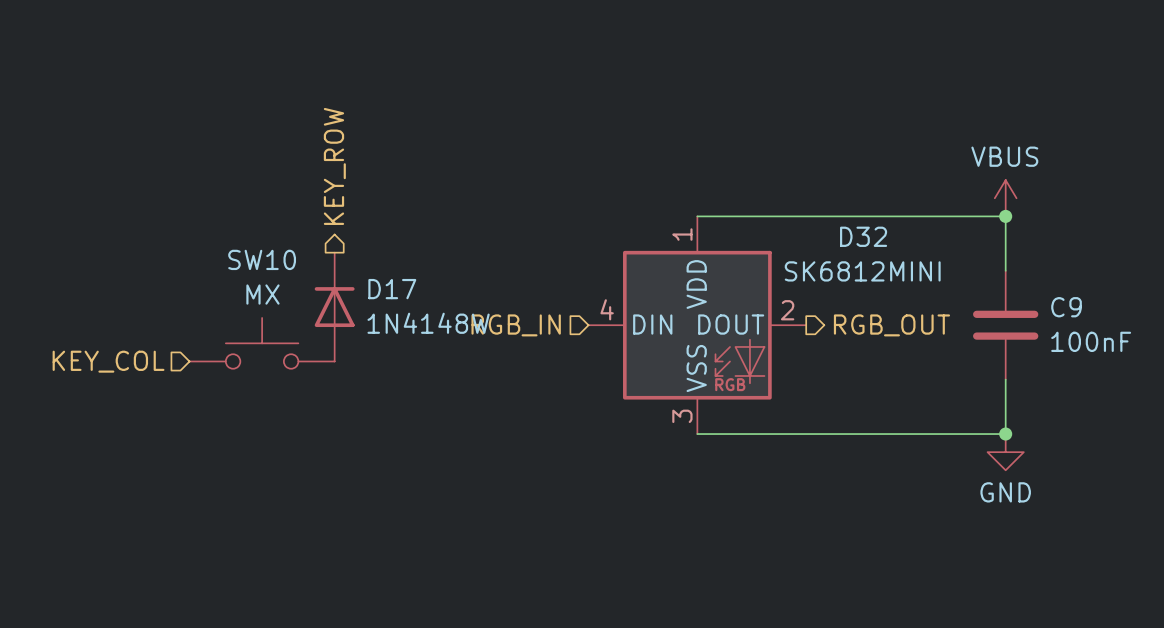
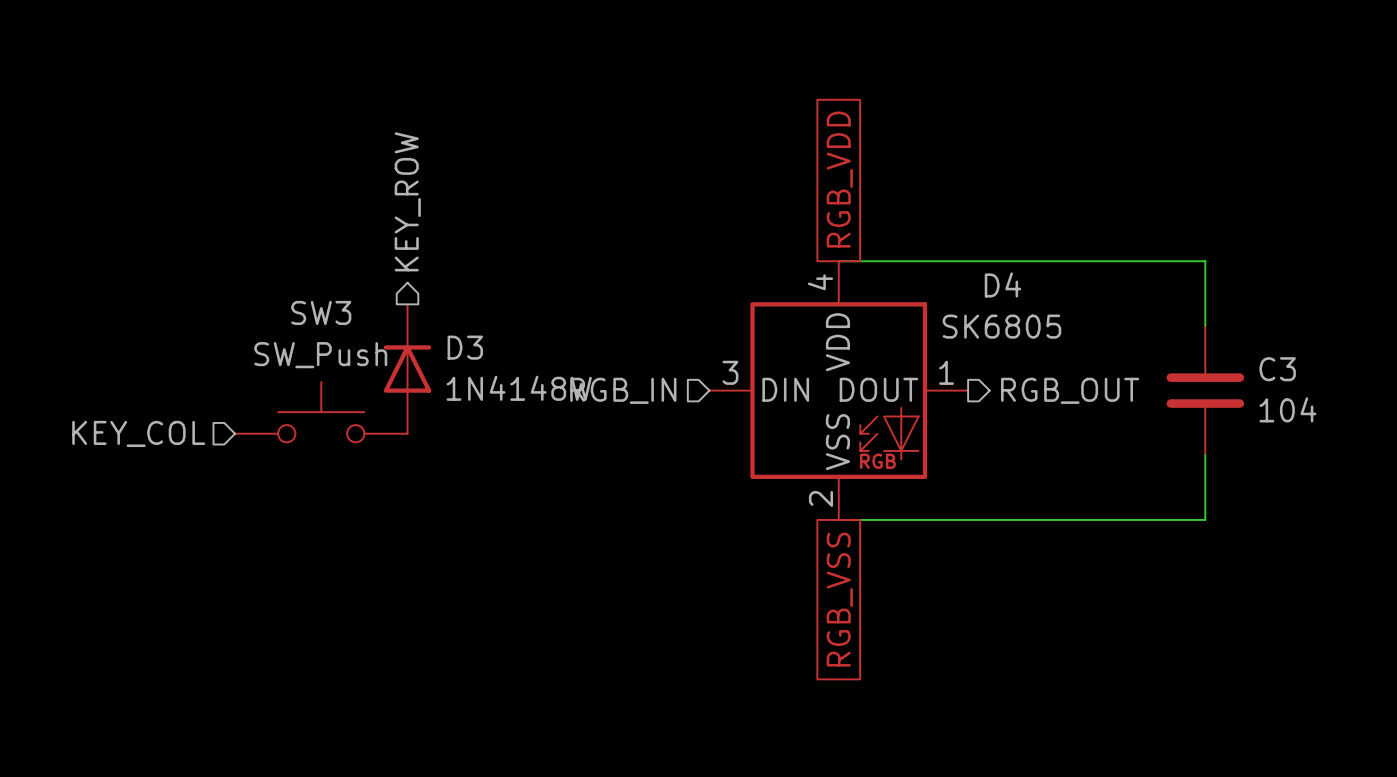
global label: none -> RGB_VDD (839, 179)
power symbol: VBUS (1005, 198) -> none
junction: (1005, 216) -> none
D32 pin number: 1 (682, 234) -> 4 (820, 282)
D32 name: D32 (863, 236) -> D4 (1002, 284)
SW10 name: SW10 (262, 259) -> SW3 (321, 312)
D32 value: SK6812MINI (862, 271) -> SK6805 (1001, 326)
D17 name: D17 (392, 289) -> D3 (465, 347)
SW10 value: MX (262, 294) -> SW_Push (320, 355)
C9 name: C9 (1066, 307) -> C3 (1277, 369)
D32 pin number: 4 (607, 309) -> 3 (730, 372)
D32 pin number: 2 (787, 310) -> 1 (946, 372)
C9 value: 100nF (1091, 341) -> 104 (1287, 409)
D32 pin number: 3 (682, 416) -> 2 (820, 498)
junction: (1005, 434) -> none
power symbol: GND (1005, 452) -> none
global label: none -> RGB_VSS (839, 599)

